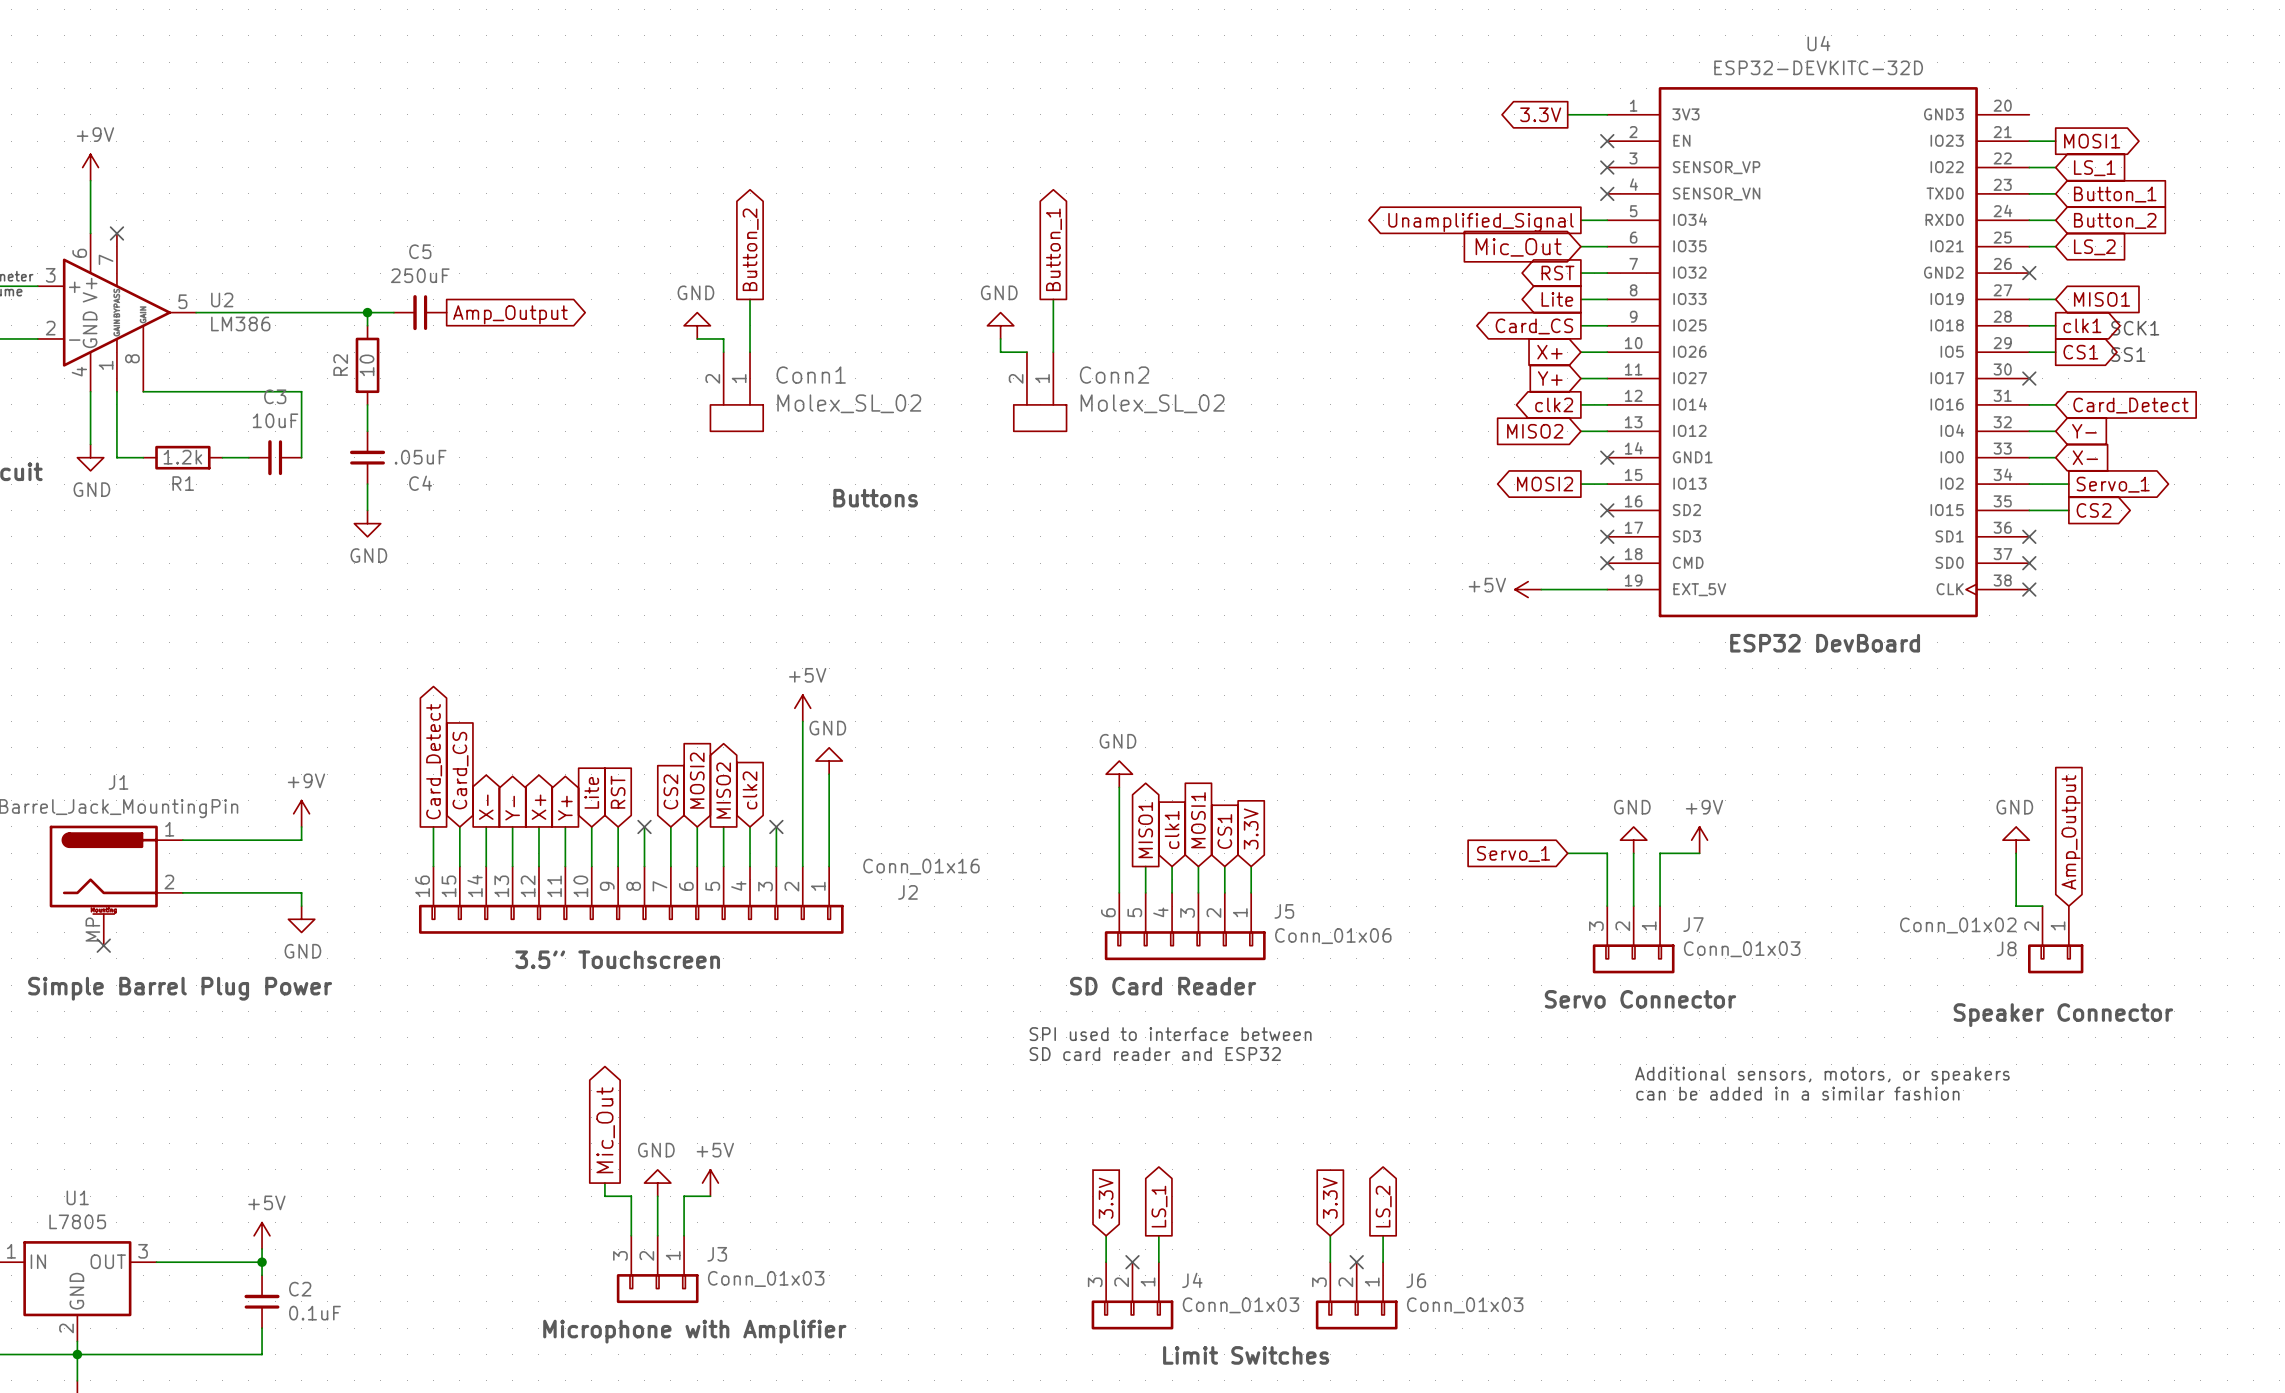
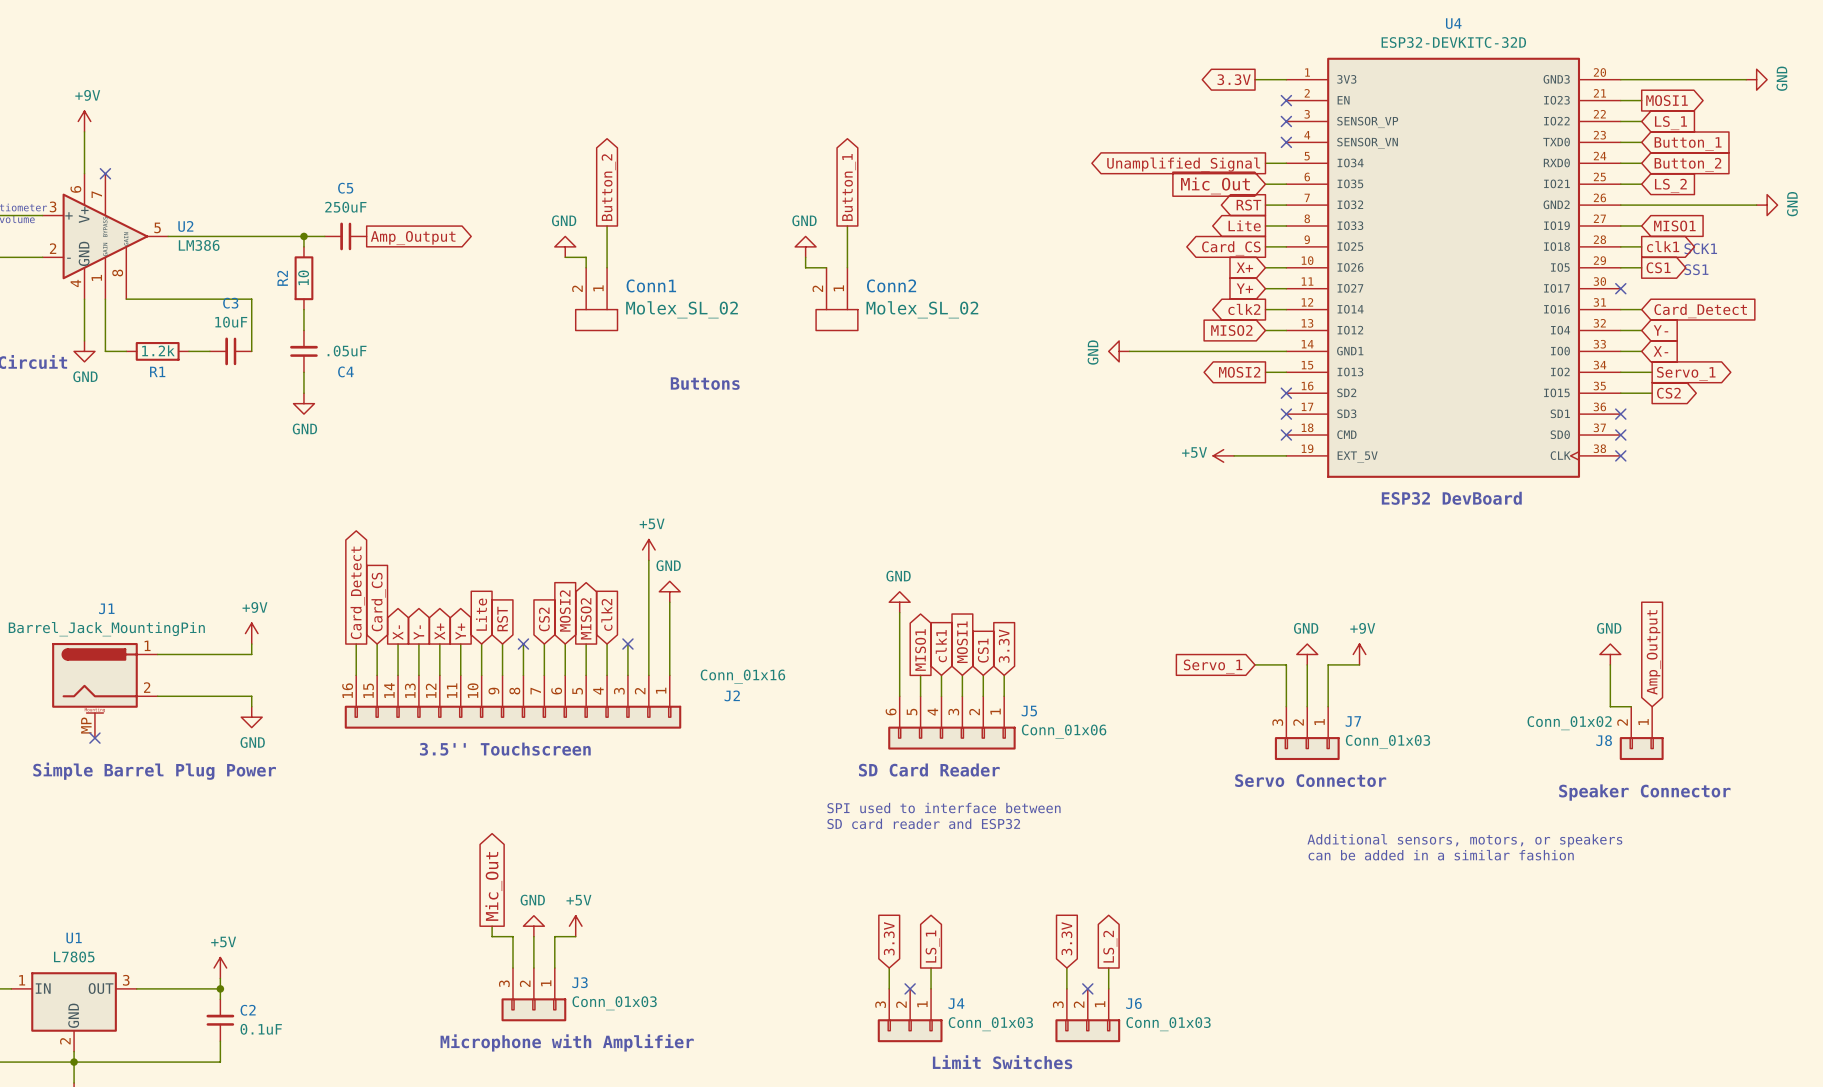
wire: none -> (1620, 79) (1746, 79)
power symbol: none -> GND (1756, 79)
wire: none -> (1620, 205) (1756, 205)
no-connect mark: (2029, 273) -> none
power symbol: none -> GND (1767, 205)
power symbol: none -> GND (1119, 351)
wire: none -> (1129, 351) (1286, 351)
no-connect mark: (1607, 457) -> none

